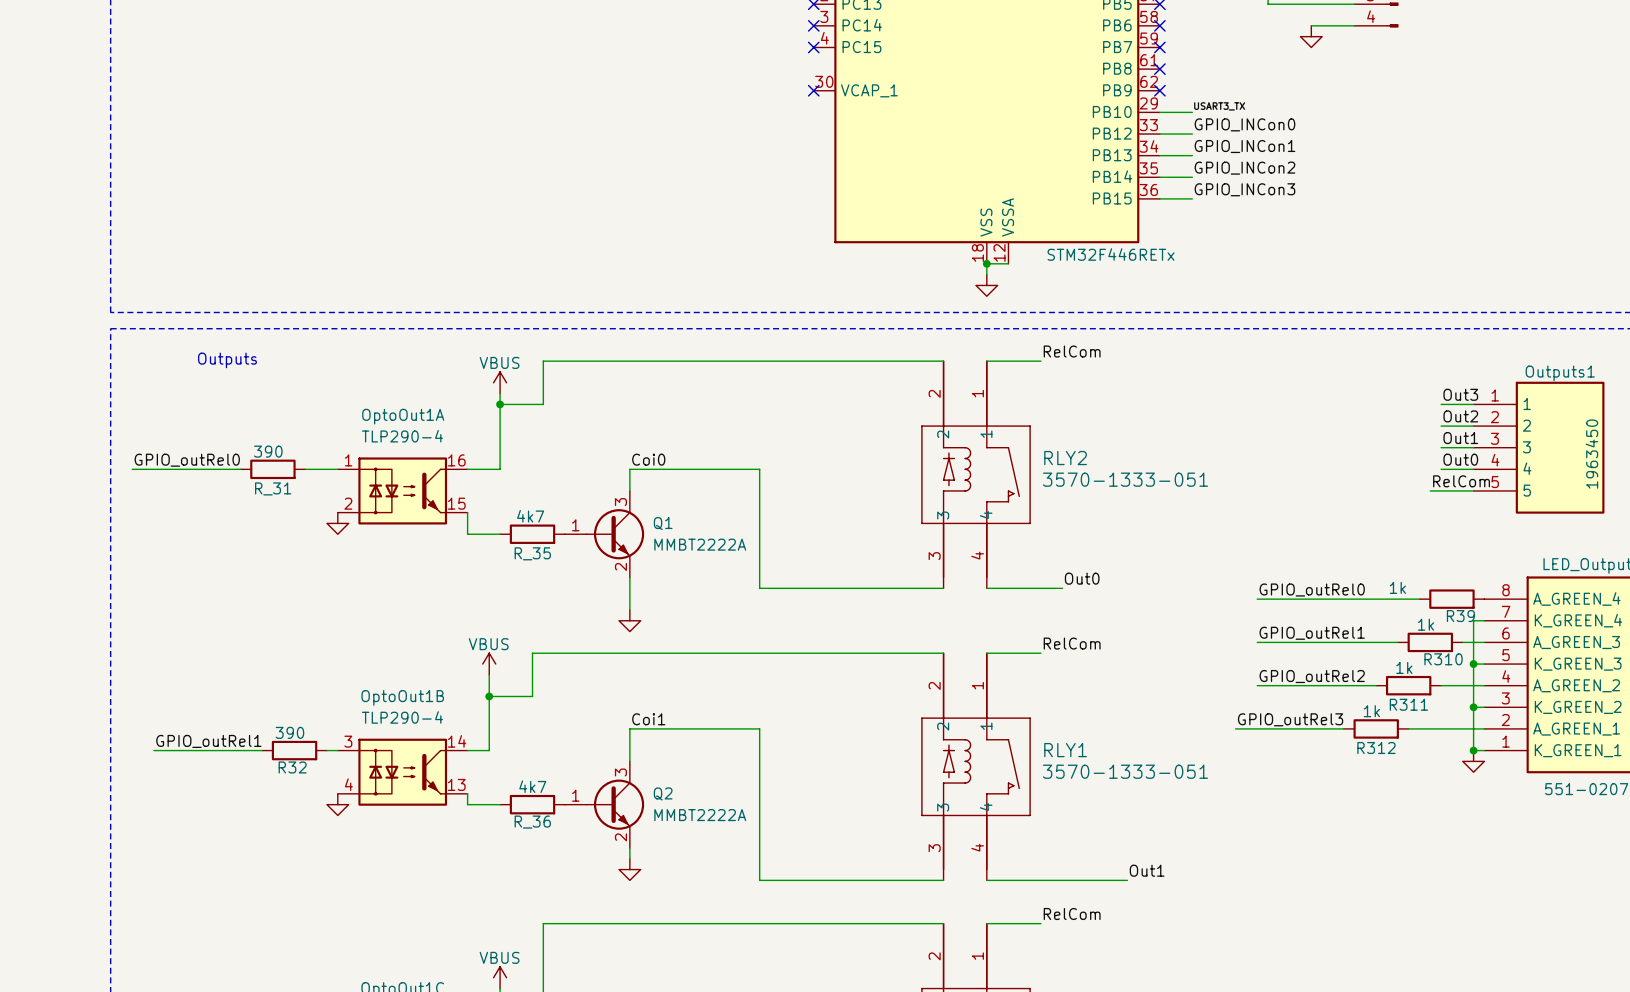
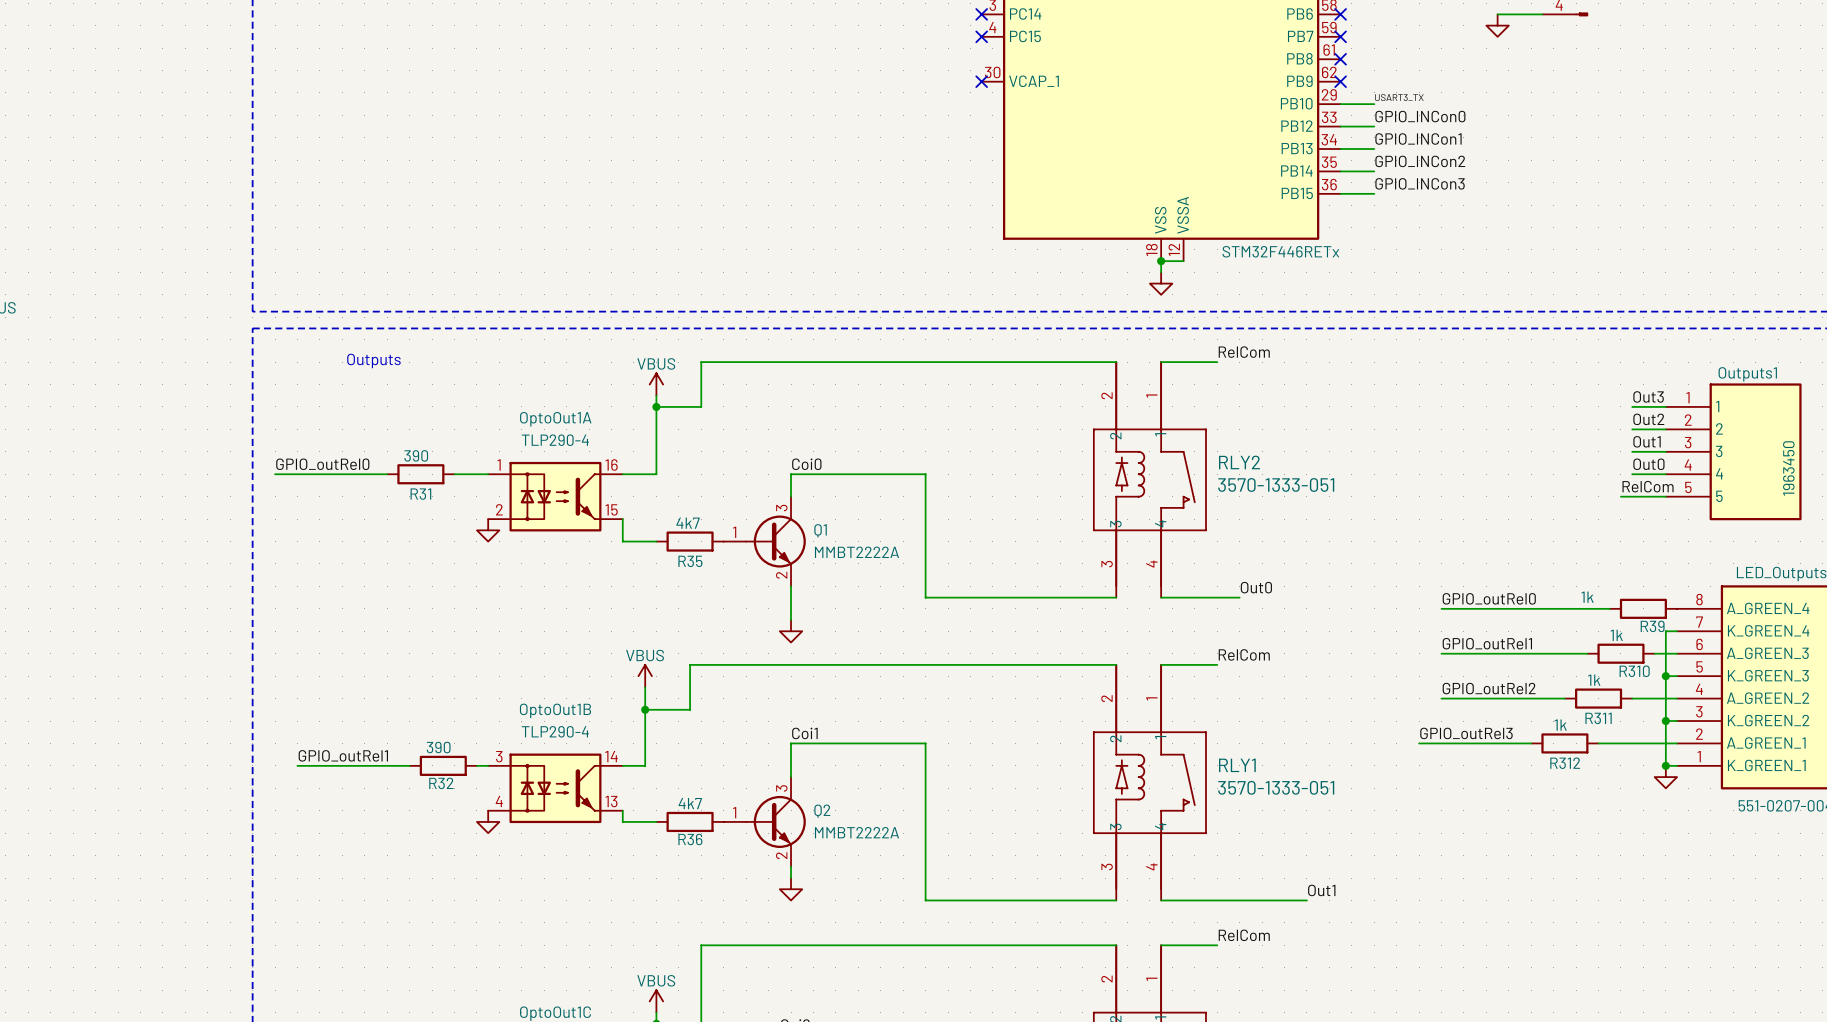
R_31 name: R_31 (273, 488) -> R31 (420, 494)
R_35 name: R_35 (532, 553) -> R35 (690, 561)
R_36 name: R_36 (532, 822) -> R36 (690, 839)

